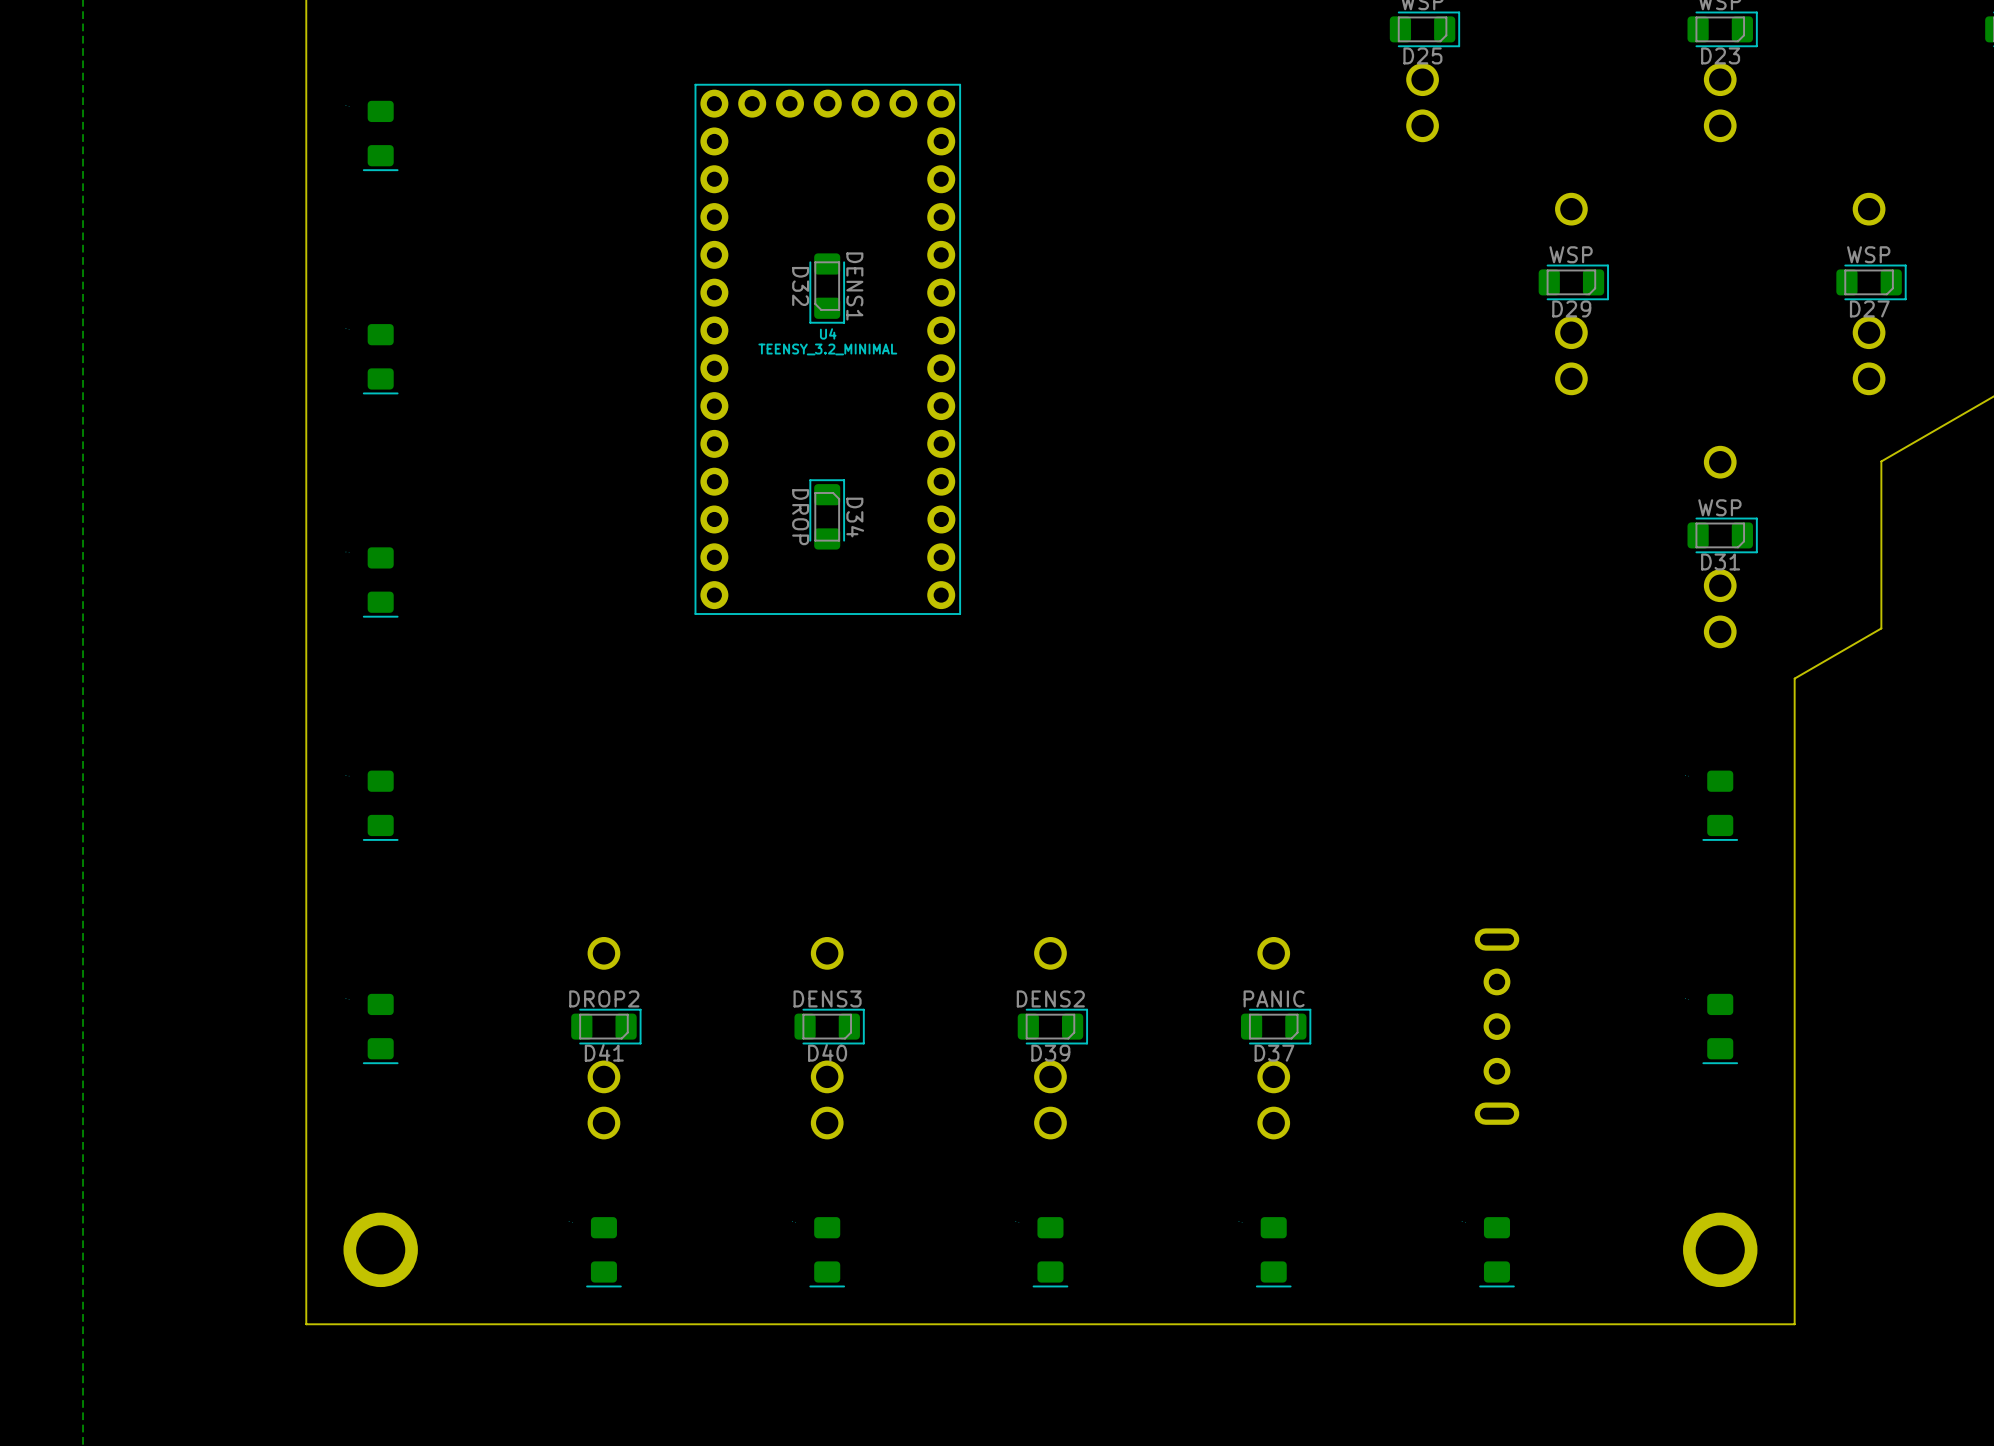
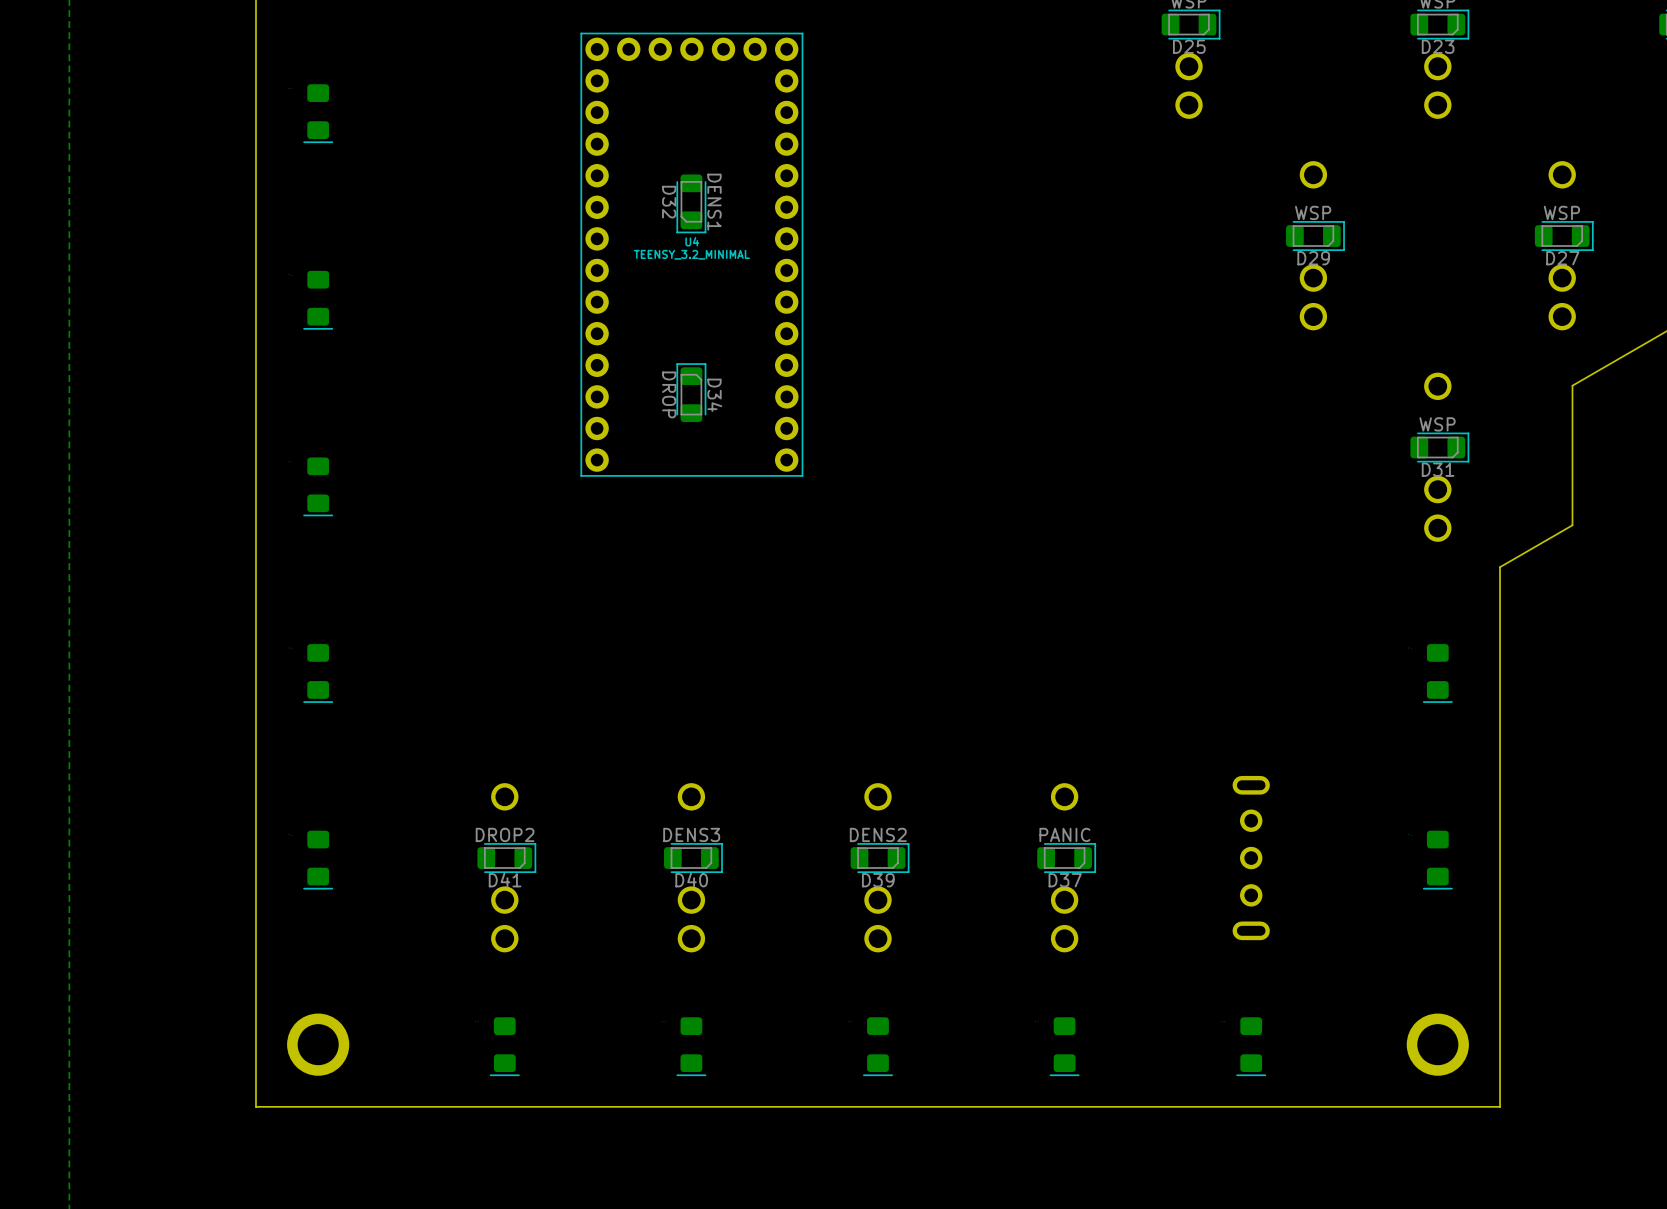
D32 position: (827, 288) -> (691, 203)
U4 position: (827, 349) -> (691, 254)
D34 position: (827, 514) -> (691, 392)

